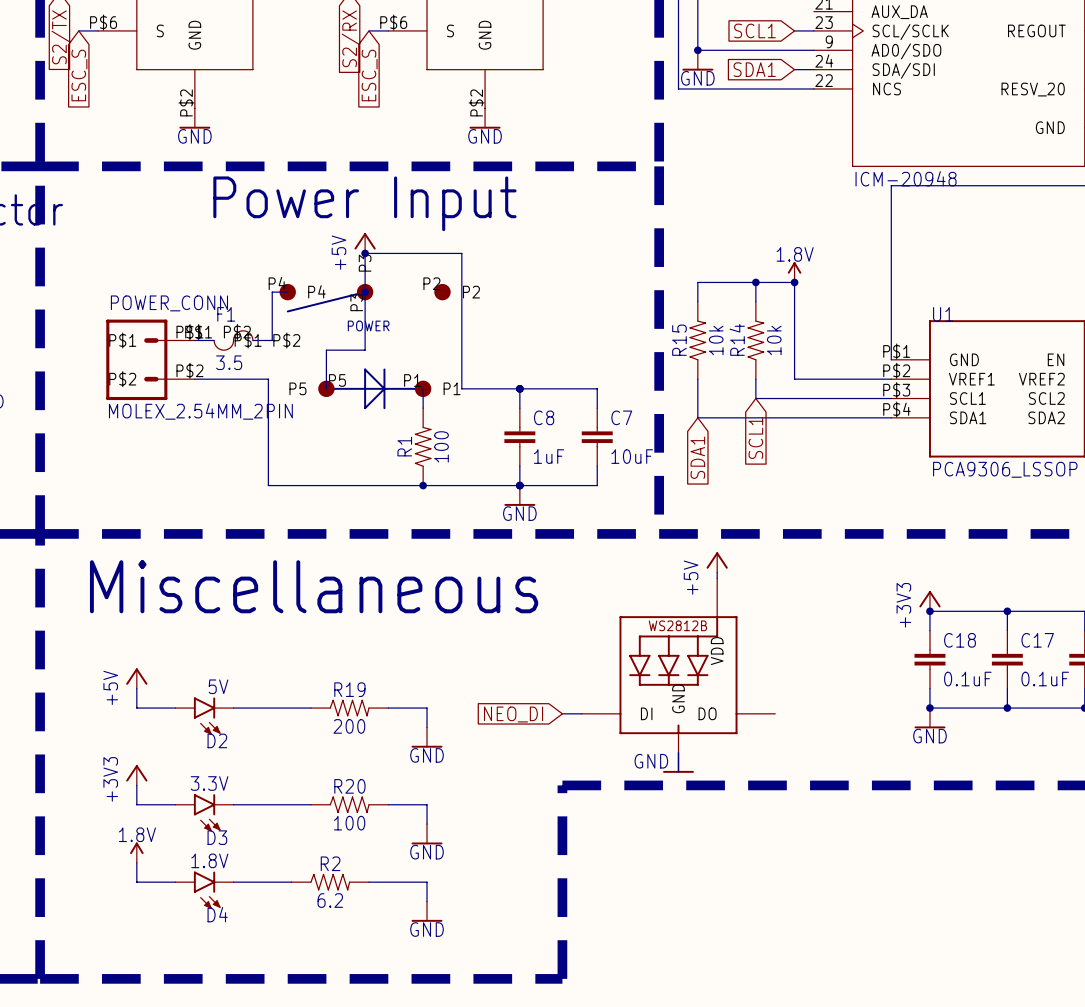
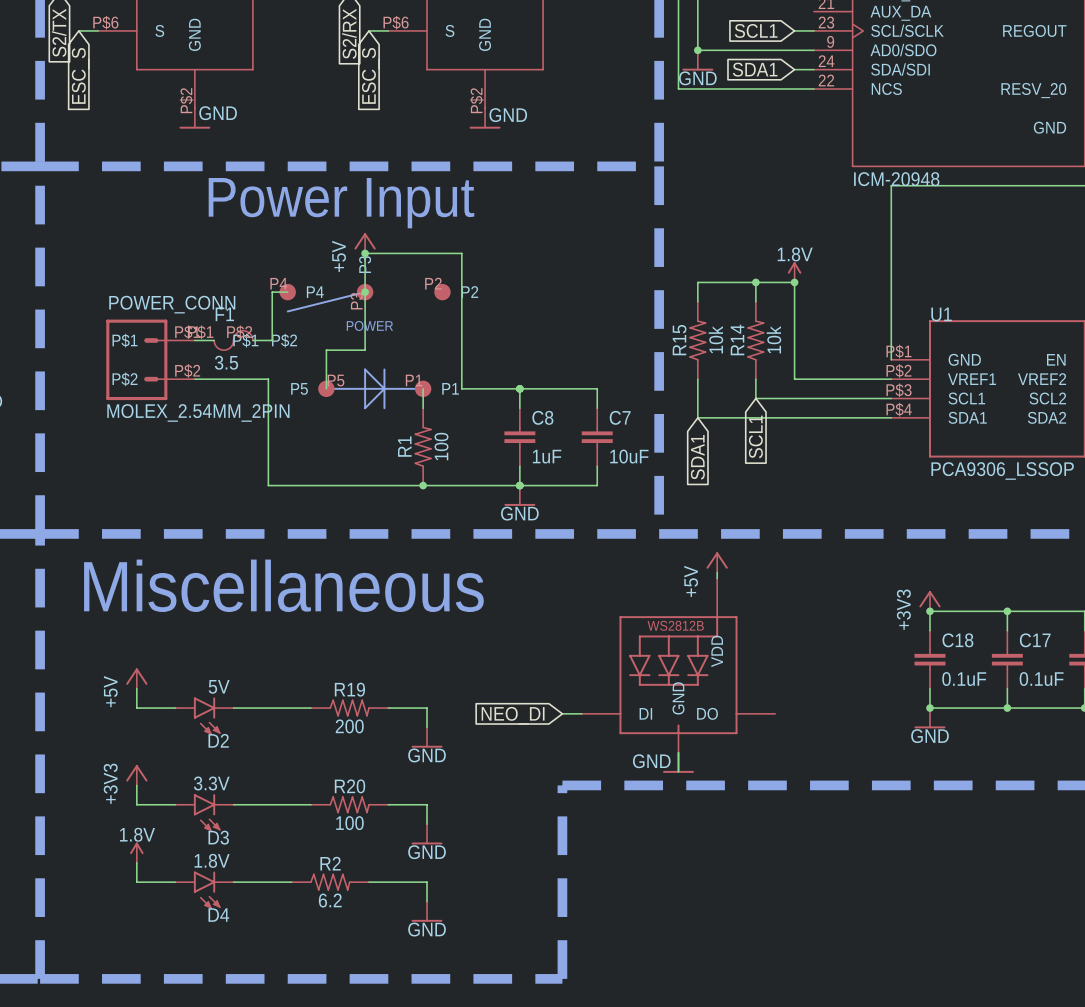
power symbol text position: GND (194, 136) -> GND (218, 113)
power symbol text position: GND (485, 136) -> GND (508, 115)

